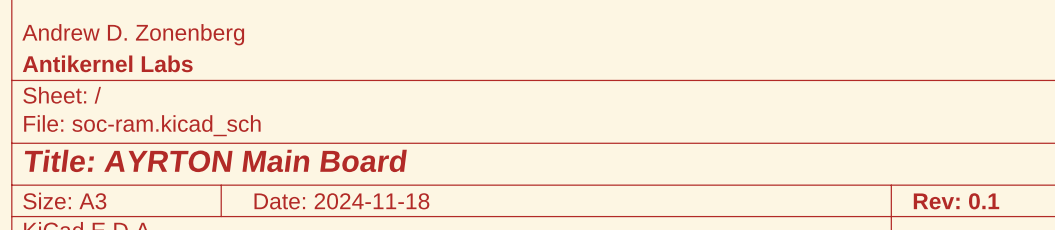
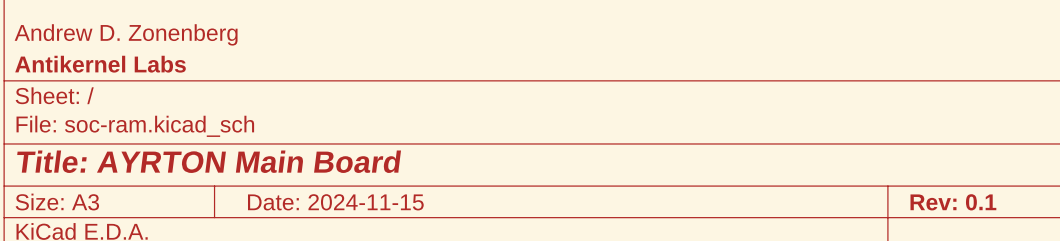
title block: Date: 2024-11-18 (341, 201) -> Date: 2024-11-15 (335, 202)

